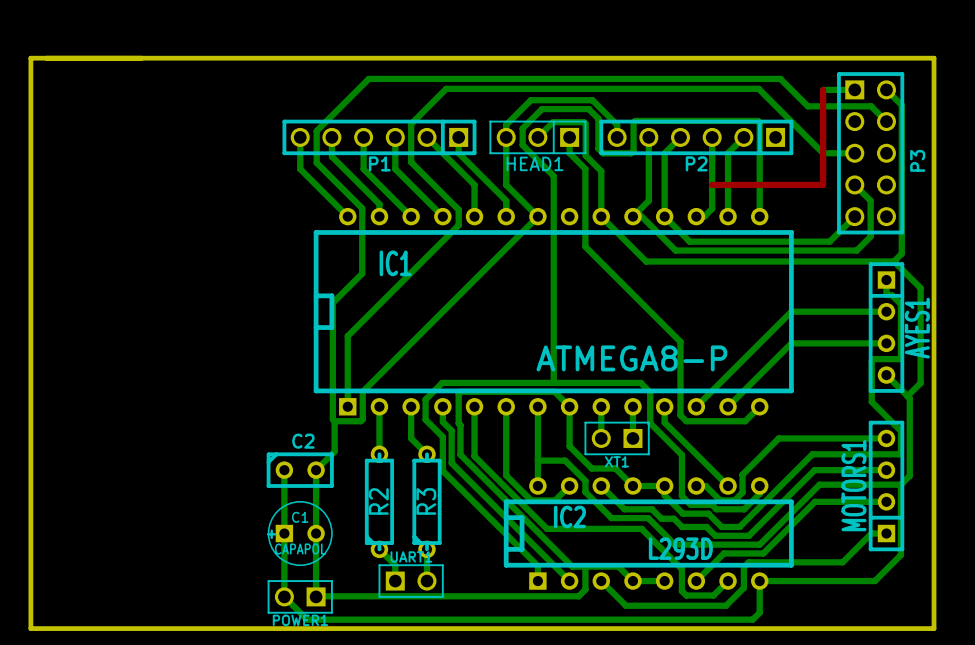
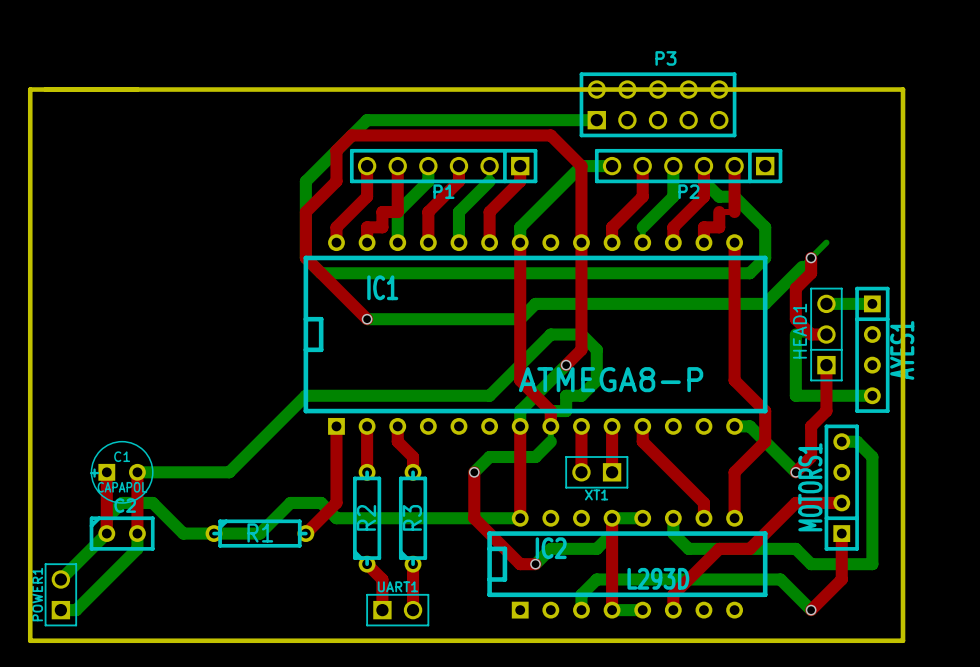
bottom track: none -> (596, 120) (367, 120) (305, 181) (305, 257) (321, 273) (749, 273) (765, 257) (765, 227) (734, 196) (719, 196) (703, 181) (703, 166)
top track: (823, 89) (823, 184) (759, 184) -> (734, 166) (734, 212)
bottom track: (823, 89) (854, 89) -> none
bottom track: (886, 89) (901, 105) (901, 253) (894, 261) -> none
bottom track: (886, 121) (871, 106) (807, 106) (780, 78) (368, 78) (316, 131) (316, 162) (362, 208) (362, 273) (332, 302) (332, 419) (334, 421) -> none
bottom track: (300, 137) (300, 169) (347, 216) -> none
bottom track: (331, 137) (331, 156) (379, 204) (379, 216) -> none
bottom track: (363, 137) (363, 169) (411, 216) -> (428, 166) (428, 181) (397, 212) (397, 242)
top track: none -> (367, 166) (367, 196) (336, 227) (336, 242)
P1 position: (379, 137) -> (443, 166)
bottom track: (395, 137) (395, 169) (442, 216) -> none
top track: none -> (397, 166) (397, 212) (382, 212) (382, 227) (367, 227) (367, 242)
bottom track: (426, 137) (474, 184) -> (489, 181) (458, 212)
bottom track: (458, 137) (458, 153) (506, 200) (506, 216) -> none
top track: none -> (458, 166) (458, 181) (428, 212) (428, 242)
bottom track: (506, 137) (506, 124) (530, 100) (592, 100) (617, 124) (617, 137) -> none
top track: none -> (520, 166) (520, 181) (489, 212) (489, 242)
bottom track: (537, 137) (553, 122) (583, 122) (585, 123) (585, 155) (601, 171) (601, 216) (646, 261) (894, 261) -> none
HEAD1 rotation: 0° (537, 137) -> 90° clockwise (826, 334)
HEAD1 position: (537, 137) -> (826, 334)
bottom track: (569, 137) (569, 153) (585, 168) (585, 246) (680, 341) (680, 415) (686, 421) (745, 421) (759, 406) -> (795, 472) (749, 426) (734, 426)
bottom track: none -> (612, 166) (581, 166) (520, 227) (520, 242)
bottom track: (648, 137) (648, 200) (632, 216) -> none
top track: none -> (642, 166) (642, 196) (612, 227) (612, 242)
bottom track: (680, 137) (664, 153) (664, 200) -> (673, 166) (673, 196) (642, 227)
P2 position: (696, 137) -> (688, 166)
bottom track: (712, 137) (712, 208) (704, 216) (696, 216) -> none
top track: none -> (703, 166) (703, 196) (673, 227) (673, 242)
bottom track: (743, 137) (728, 153) (728, 216) -> none
bottom track: (506, 153) (506, 184) (537, 216) (362, 391) (362, 419) (360, 421) (334, 421) -> none
bottom track: (854, 153) (823, 153) (758, 88) (446, 88) (411, 123) (411, 162) (458, 209) (458, 225) (347, 336) (347, 406) -> none
P3 rotation: 0° (870, 153) -> 90° counterclockwise (658, 104)
P3 position: (870, 153) -> (658, 104)
bottom track width: thin (474, 184) (474, 216) -> thick (458, 212) (458, 242)
top track: (712, 184) (743, 184) -> (703, 242) (703, 227) (719, 227) (719, 212)
bottom track: (854, 184) (870, 200) (870, 236) (856, 250) (675, 250) (637, 212) -> none
top track: none -> (520, 242) (520, 380) (550, 411) (550, 426)
bottom track: (664, 216) (689, 241) (829, 241) -> (367, 319) (520, 319) (535, 303) (765, 303) (802, 266)
top track: none -> (734, 242) (734, 380) (765, 411) (765, 441) (734, 472) (734, 518)
bottom track: (759, 216) (759, 122) (757, 120) (635, 120) (633, 122) (633, 150) (631, 153) (603, 153) (598, 148) (598, 118) (588, 109) (542, 109) (522, 128) (522, 145) (553, 176) (553, 382) -> none
top track: none -> (811, 257) (811, 273) (795, 288) (795, 319) (811, 334) (826, 334)
via: none -> (811, 257)
bottom track: (894, 261) (920, 288) (920, 383) (907, 396) -> none
bottom track: none -> (826, 303) (872, 303)
bottom track: (886, 280) (886, 295) (891, 295) (900, 304) (900, 357) (899, 359) (873, 359) (871, 361) (871, 401) (900, 431) (900, 452) (899, 454) (812, 454) (739, 526) (721, 526) (708, 513) (682, 513) (664, 495) (664, 485) (632, 485) (615, 468) (591, 468) (569, 446) (569, 422) -> (474, 472) (489, 457) (535, 457) (550, 441)
top track: none -> (367, 319) (305, 257) (305, 212) (336, 181) (336, 150) (351, 135) (550, 135) (581, 166) (581, 349) (566, 365)
via: none -> (367, 319)
bottom track: (823, 311) (791, 311) (696, 406) -> (795, 334) (795, 395) (872, 395)
bottom track: (854, 311) (886, 311) -> none
AYES1 position: (886, 327) -> (872, 349)
via: none -> (566, 365)
top track: none -> (826, 365) (826, 411) (811, 426) (811, 457) (795, 472)
bottom track: (886, 343) (791, 343) (728, 406) -> none
bottom track: (886, 375) (909, 398) (909, 475) (900, 484) -> none
top track: none -> (336, 426) (336, 502) (305, 533)
top track: none -> (367, 426) (367, 472)
bottom track: (379, 406) (379, 454) -> none
top track: none -> (397, 426) (397, 441) (413, 457) (413, 472)
bottom track: (411, 406) (411, 438) (426, 454) -> none
bottom track: (442, 406) (442, 421) (451, 430) (451, 463) (569, 581) -> none
bottom track: (474, 406) (474, 456) (547, 528) (641, 528) (681, 569) (681, 591) (686, 595) (713, 595) (728, 581) -> none
bottom track: (506, 406) (506, 475) (531, 500) (555, 500) (569, 485) -> none
top track: none -> (520, 426) (520, 518)
bottom track: (537, 406) (537, 485) -> (520, 426) (520, 411) (566, 365)
bottom track: (569, 406) (554, 391) (460, 391) (458, 393) (458, 423) (460, 425) (460, 454) (572, 566) (618, 566) (632, 581) (664, 581) -> (550, 426) (550, 411) (566, 411) (566, 395) (581, 395) (596, 380) (596, 349) (581, 334) (550, 334) (489, 395) (305, 395) (229, 472) (137, 472)
top track: none -> (581, 426) (581, 472)
top track: none -> (612, 426) (612, 472)
top track: none -> (642, 426) (642, 441) (703, 502) (703, 518)
bottom track: (664, 406) (664, 422) (728, 485) -> none
bottom track: (334, 421) (334, 451) (316, 470) (316, 596) -> none
bottom track: none -> (841, 441) (857, 441) (872, 457) (872, 564) (811, 564) (795, 548) (688, 548) (673, 533) (673, 518)
XT1 position: (617, 438) -> (596, 472)
bottom track: (886, 438) (778, 438) (742, 474) (742, 492) (734, 500) (720, 500) (705, 485) (696, 485) -> none
top track: none -> (106, 472) (106, 533)
top track: none -> (137, 472) (137, 533)
top track: none -> (474, 472) (474, 518) (520, 564) (535, 564)
via: none -> (474, 472)
via: none -> (795, 472)
bottom track: (537, 460) (565, 460) (585, 480) (585, 492) (611, 518) (648, 518) (674, 544) (759, 544) (819, 484) (900, 484) -> none
bottom track: (284, 470) (284, 596) (307, 619) (752, 619) (759, 612) (759, 581) (874, 581) (900, 555) (900, 484) -> none
C2 position: (300, 470) -> (122, 533)
bottom track: (886, 470) (814, 470) (748, 535) (715, 535) (706, 526) (682, 526) (673, 518) (661, 518) (651, 509) (624, 509) (601, 485) -> none
bottom track: (759, 485) (759, 493) (744, 509) (716, 509) (712, 504) (690, 504) (681, 495) (681, 454) (650, 423) (650, 392) (640, 382) (442, 382) (425, 399) (425, 419) (442, 436) (442, 471) (537, 566) (537, 581) -> none
top track: none -> (841, 502) (795, 502) (749, 548) (719, 548) (673, 594) (673, 610)
MOTORS1 position: (886, 485) -> (841, 487)
bottom track: none -> (520, 518) (336, 518) (321, 502) (290, 502) (259, 533) (183, 533) (152, 502) (122, 502) (106, 518) (106, 533) (60, 579)
top track: none -> (612, 518) (612, 610)
bottom track: none -> (642, 518) (612, 518) (612, 533) (596, 548) (550, 548) (535, 564)
bottom track: (886, 501) (815, 501) (763, 553) (723, 553) (696, 581) -> none
bottom track: none -> (137, 533) (137, 548) (76, 610) (60, 610)
R1: none -> (259, 533)
top track: none -> (841, 533) (841, 579) (811, 610)
C1 position: (300, 533) -> (122, 472)
IC2 position: (648, 533) -> (627, 564)
bottom track: (886, 533) (871, 533) (842, 562) (748, 562) (743, 567) (743, 587) (726, 605) (625, 605) (601, 581) -> none
top track: none -> (367, 564) (382, 579) (382, 610)
top track: none -> (413, 564) (413, 610)
via: none -> (535, 564)
bottom track: (585, 566) (585, 589) (578, 596) (316, 596) -> none
UART1 position: (411, 581) -> (397, 610)
POWER1 rotation: 0° (300, 596) -> 90° clockwise (60, 594)
POWER1 position: (300, 596) -> (60, 594)
bottom track: none -> (581, 610) (581, 594) (596, 579) (780, 579) (811, 610)
bottom track: none -> (612, 610) (642, 610)
via: none -> (811, 610)

